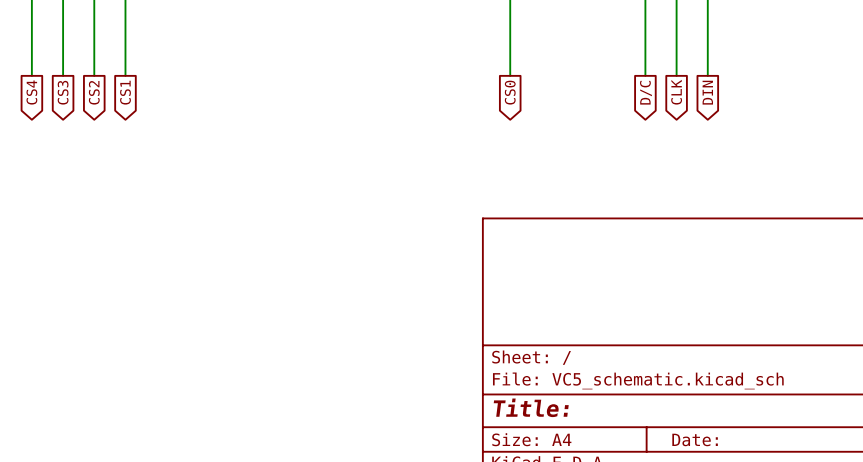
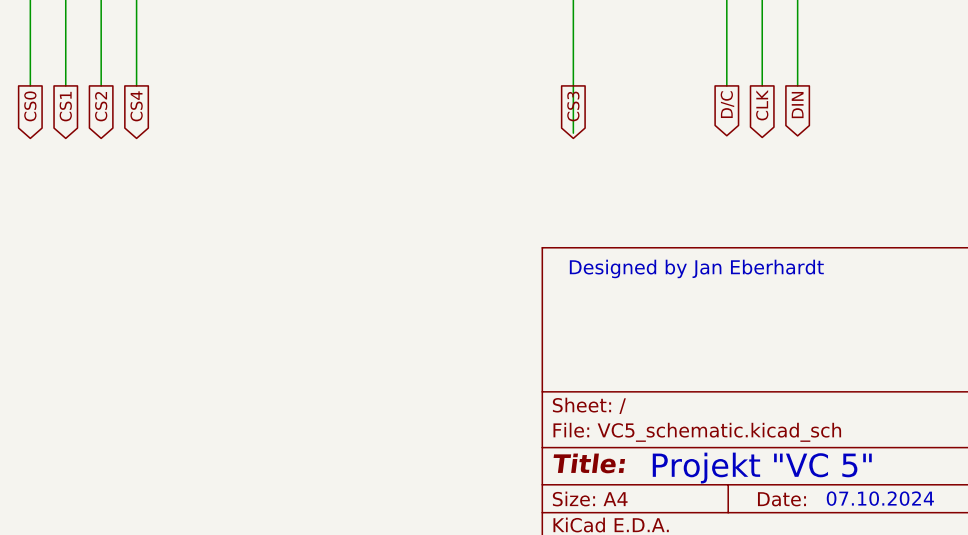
wire: none -> (573, 85) (573, 133)
global label: CS4 (31, 92) -> CS0 (30, 106)
global label: CS3 (63, 92) -> CS1 (65, 106)
global label: CS1 (125, 92) -> CS4 (136, 106)
global label: CS0 (510, 92) -> CS3 (573, 106)
text: none -> Designed by Jan Eberhardt (696, 268)
text: none -> Projekt "VC 5" (762, 468)
text: none -> 07.10.2024 (880, 498)

